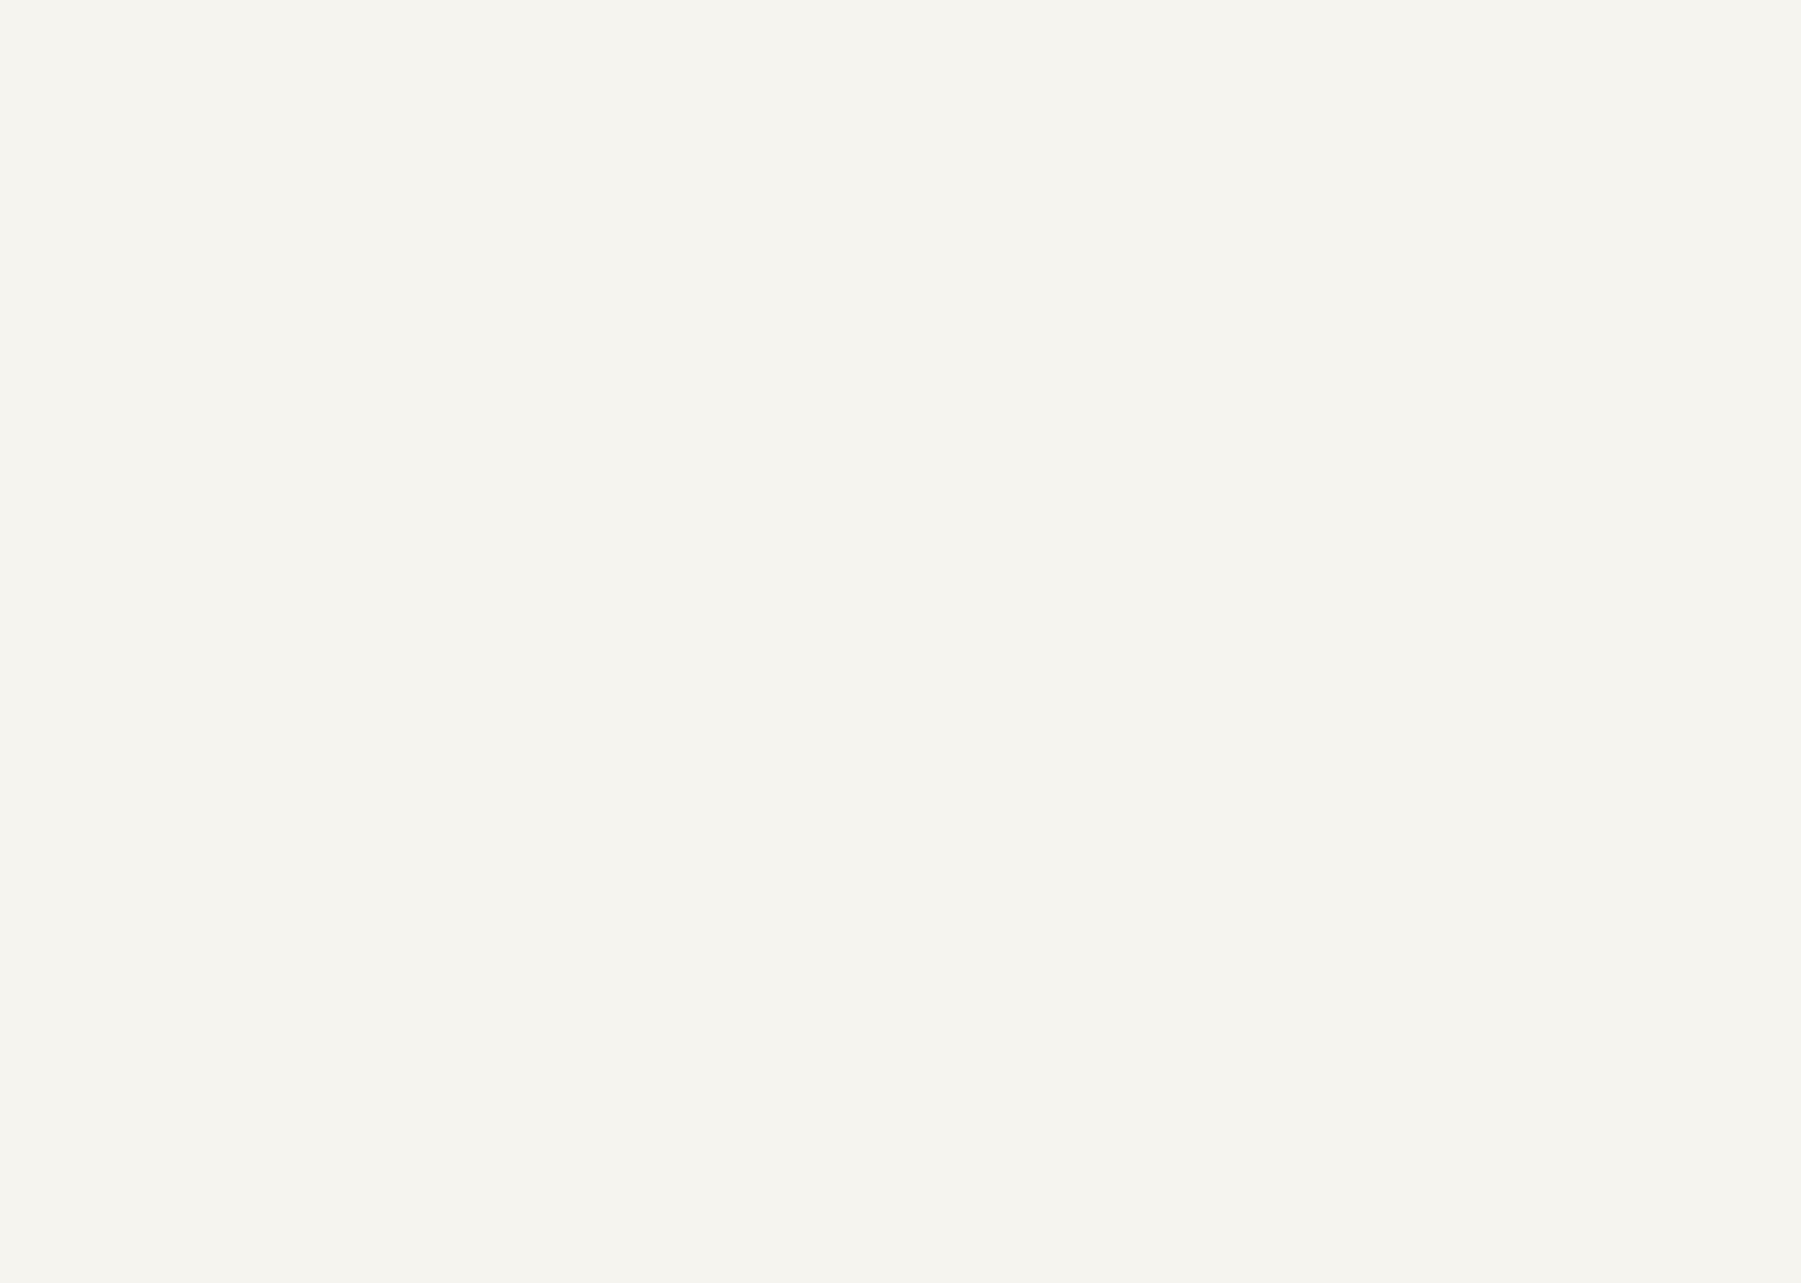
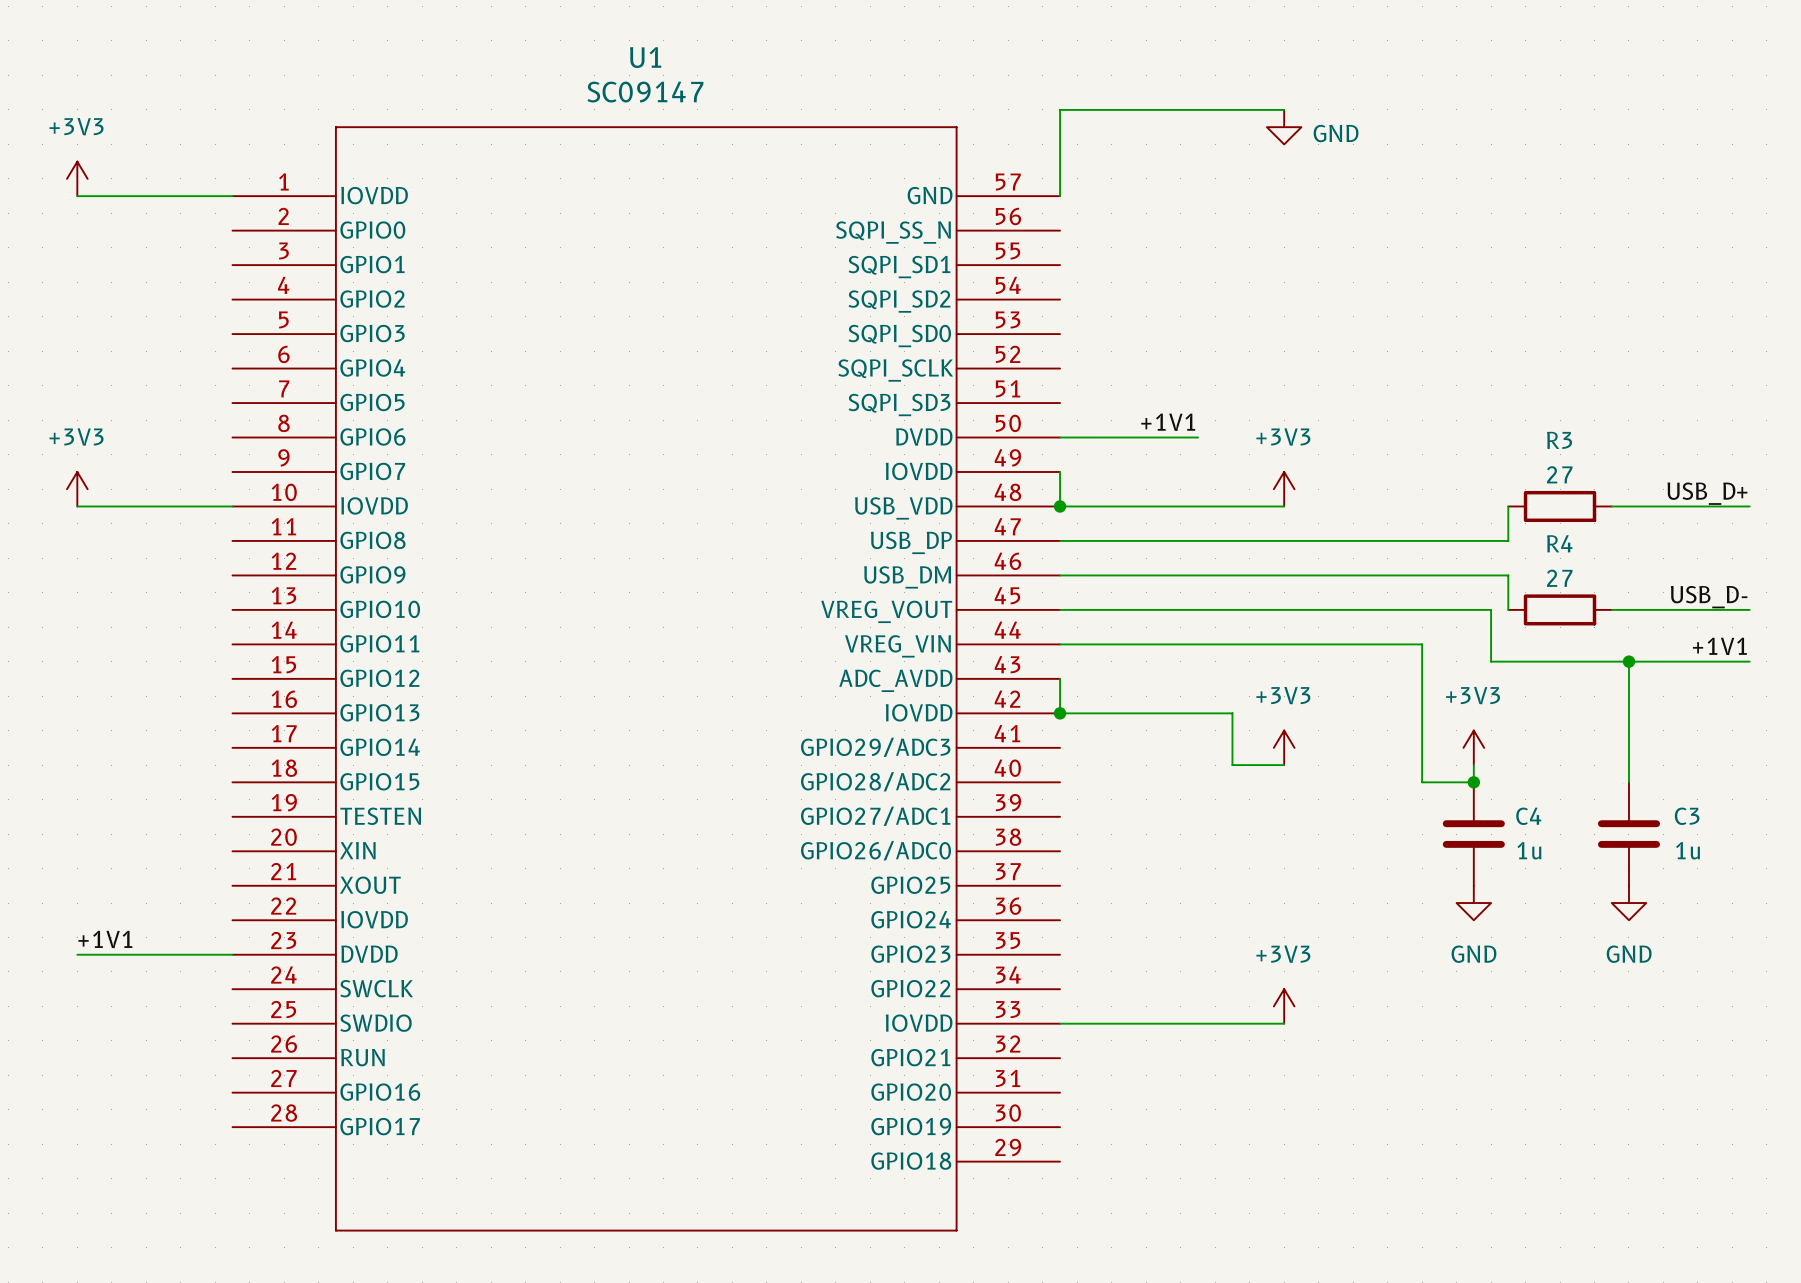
wire: none -> (1284, 109) (1060, 109) (1060, 196)
power symbol: none -> GND (1284, 127)
power symbol: none -> +3V3 (77, 178)
wire: none -> (77, 196) (232, 196)
label: none -> +1V1 (1168, 422)
wire: none -> (1060, 437) (1197, 437)
wire: none -> (1060, 471) (1060, 506) (1284, 506)
power symbol: none -> +3V3 (77, 489)
power symbol: none -> +3V3 (1284, 489)
label: none -> USB_D+ (1707, 493)
wire: none -> (77, 506) (232, 506)
junction: none -> (1060, 506)
wire: none -> (1508, 506) (1508, 540) (1060, 540)
R3: none -> 27 (1560, 506)
wire: none -> (1611, 506) (1749, 506)
wire: none -> (1060, 575) (1508, 575) (1508, 609)
label: none -> USB_D- (1709, 597)
wire: none -> (1060, 609) (1491, 609) (1491, 661) (1749, 661)
R4: none -> 27 (1560, 609)
wire: none -> (1611, 609) (1749, 609)
wire: none -> (1060, 644) (1422, 644) (1422, 782) (1473, 782) (1473, 765)
label: none -> +1V1 (1719, 646)
wire: none -> (1628, 661) (1628, 782)
junction: none -> (1628, 661)
U1: none -> SC09147 (646, 678)
wire: none -> (1060, 678) (1060, 713) (1232, 713) (1232, 765) (1284, 765)
junction: none -> (1060, 713)
power symbol: none -> +3V3 (1284, 747)
power symbol: none -> +3V3 (1473, 747)
junction: none -> (1473, 782)
C4: none -> 1u (1473, 834)
C3: none -> 1u (1628, 834)
power symbol: none -> GND (1473, 903)
power symbol: none -> GND (1628, 903)
label: none -> +1V1 (105, 939)
wire: none -> (77, 954) (232, 954)
power symbol: none -> +3V3 (1284, 1006)
wire: none -> (1060, 1023) (1284, 1023)

